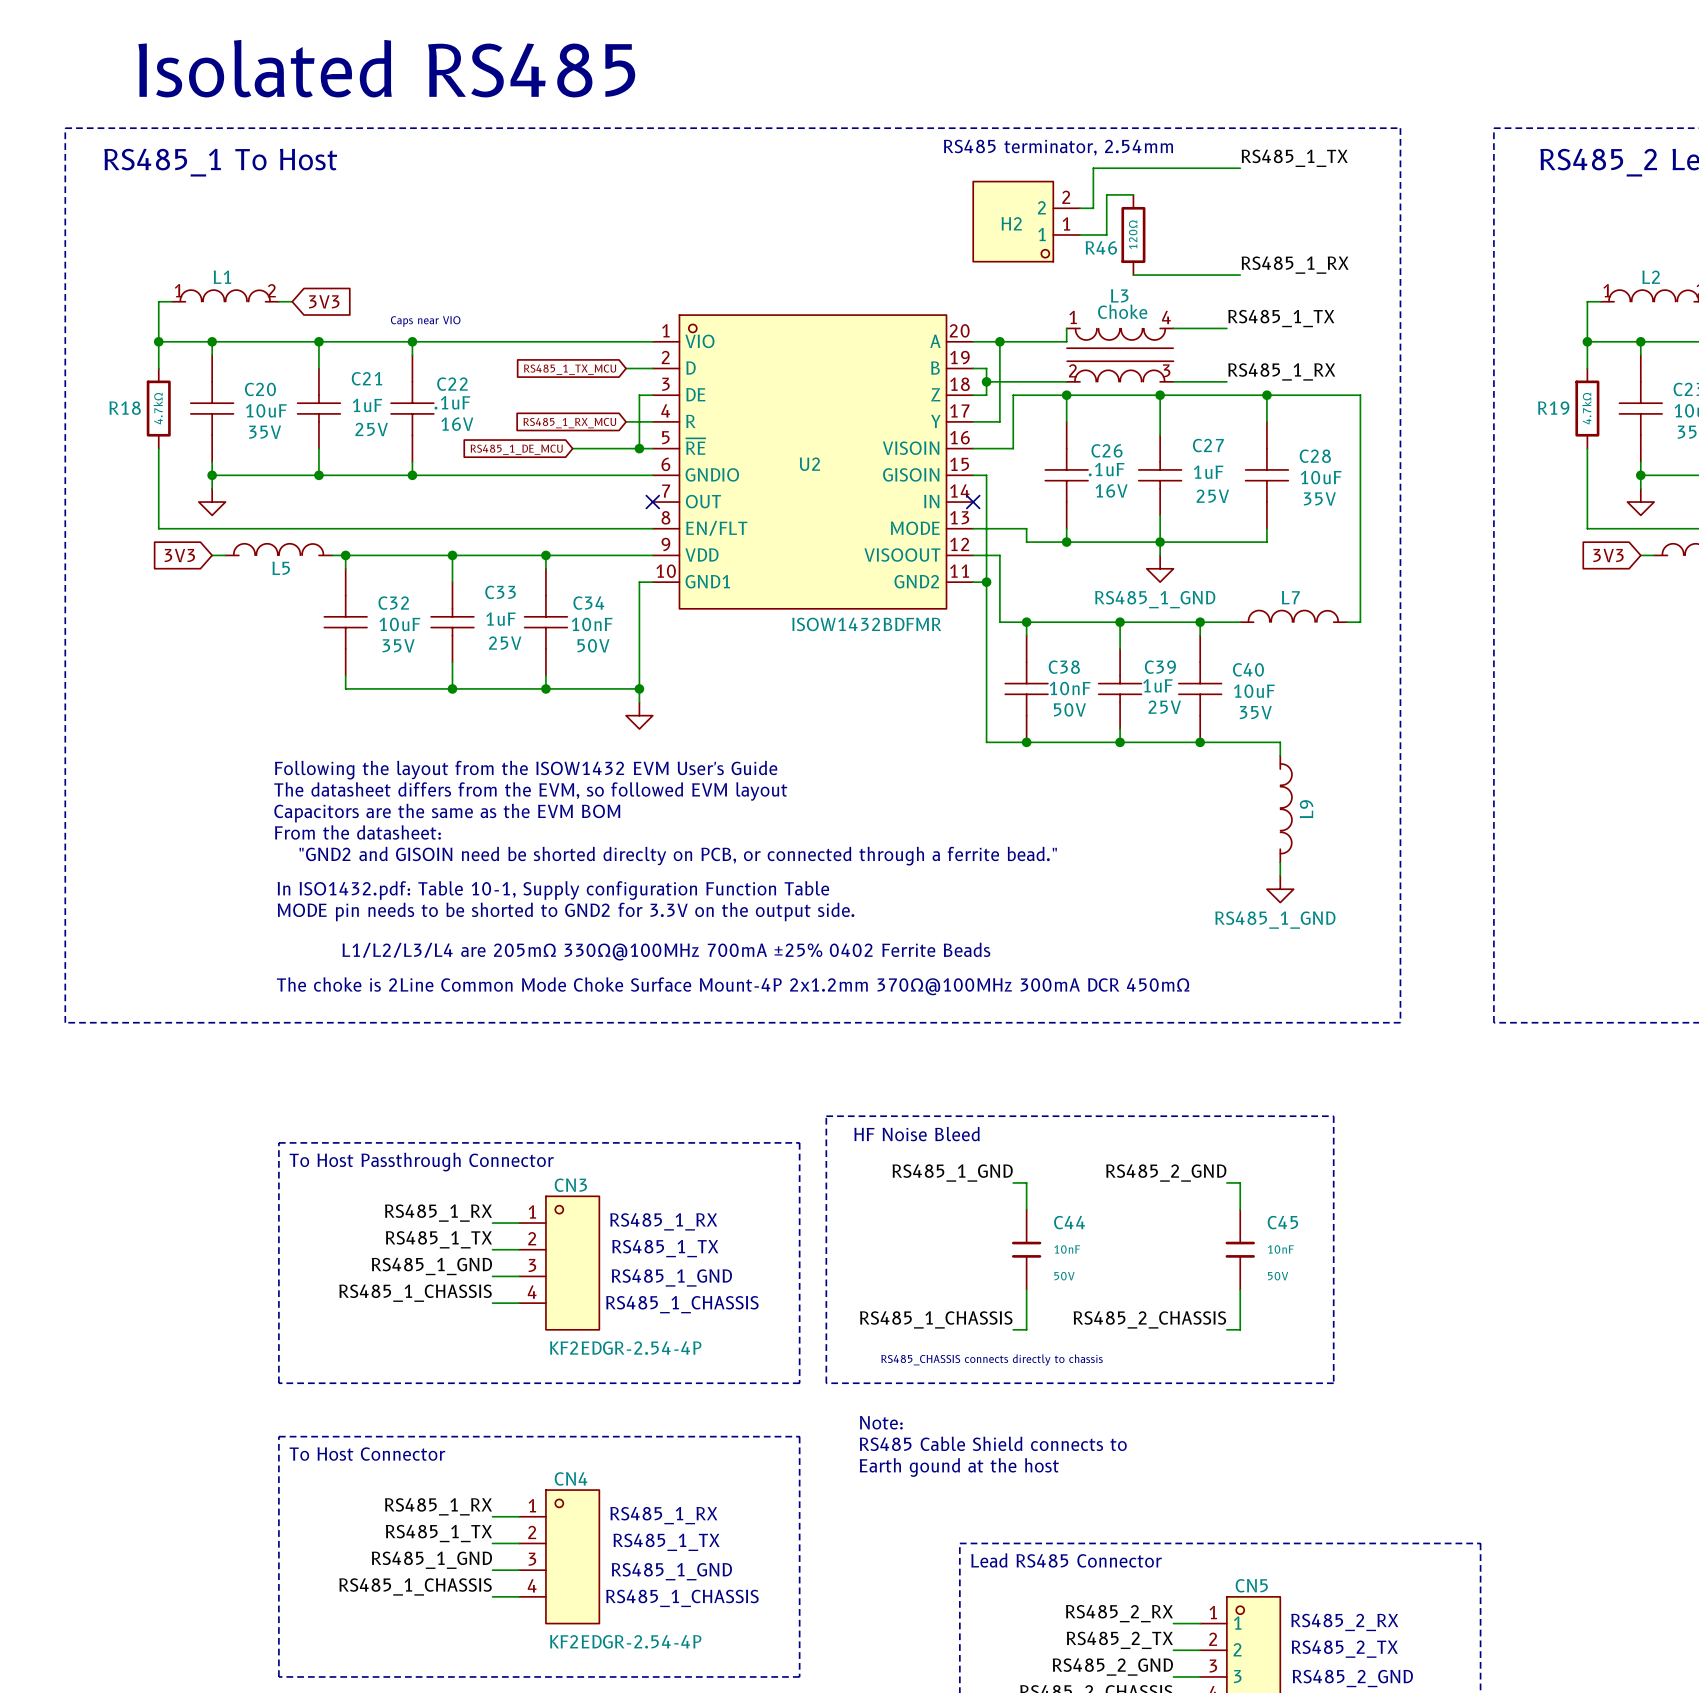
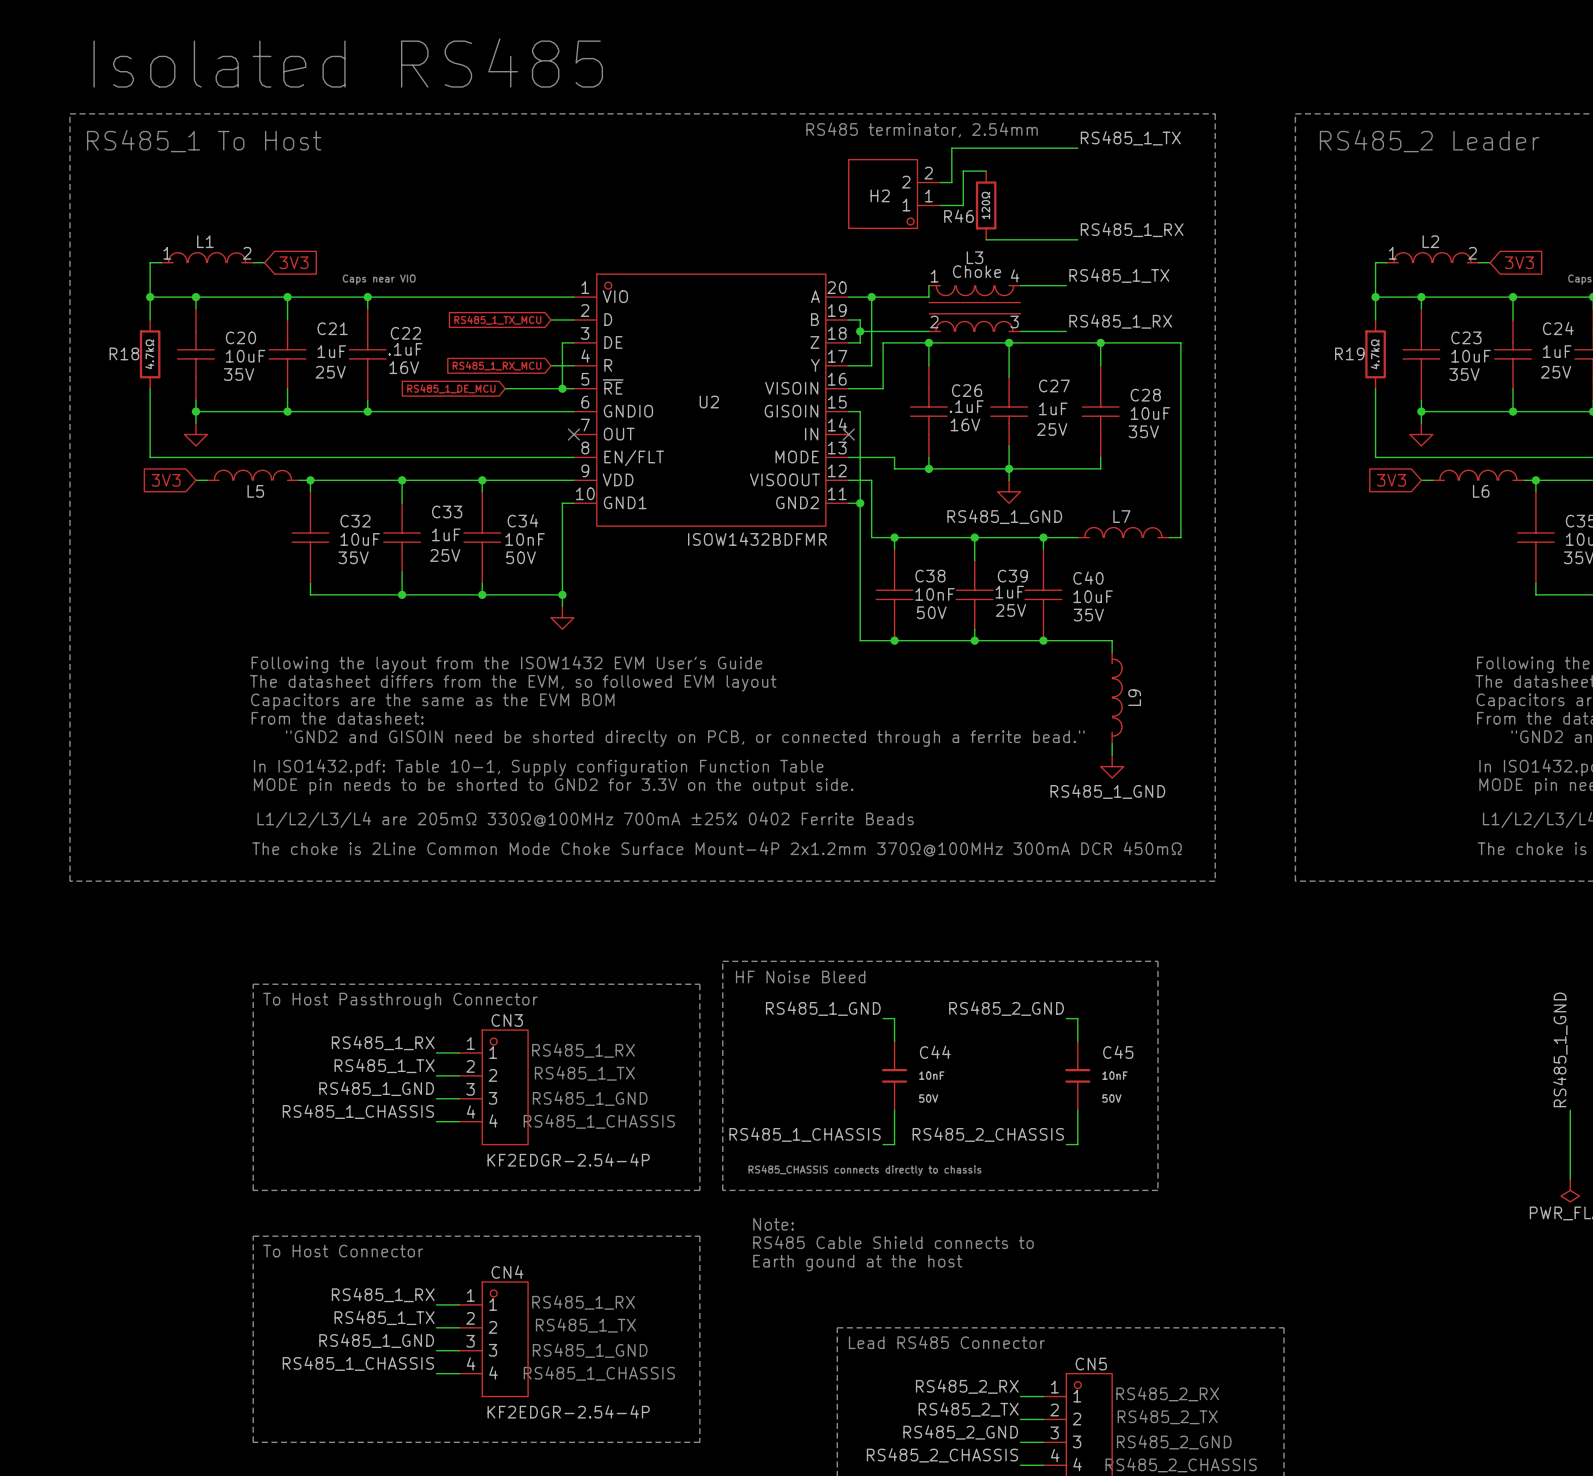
CN3 pin name: none -> 1 (493, 1052)
CN3 pin name: none -> 2 (492, 1075)
CN3 pin name: none -> 3 (492, 1098)
CN3 pin name: none -> 4 (493, 1120)
CN4 pin name: none -> 1 (493, 1304)
CN4 pin name: none -> 2 (492, 1327)
CN4 pin name: none -> 3 (492, 1350)
CN4 pin name: none -> 4 (493, 1372)

